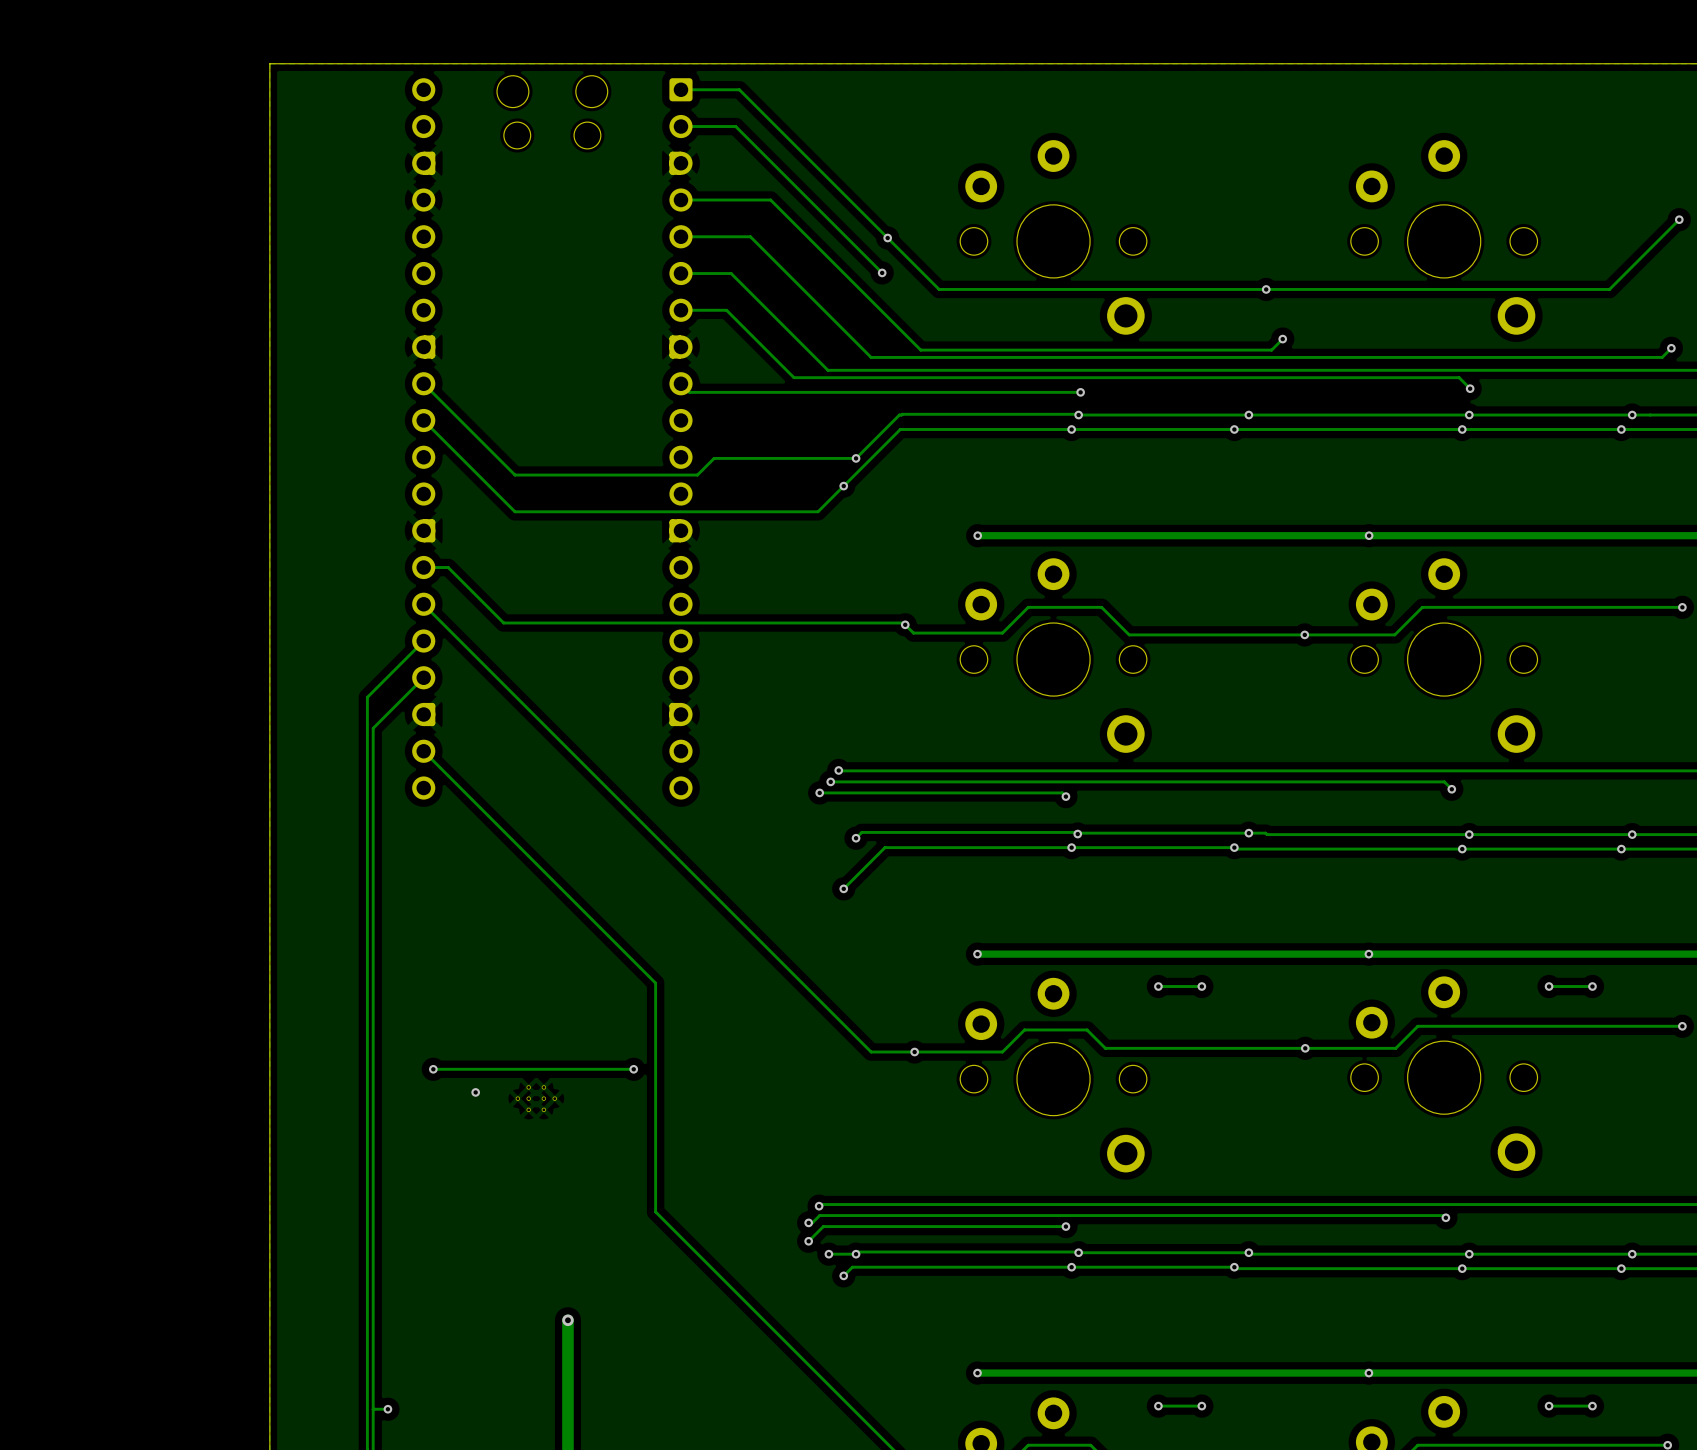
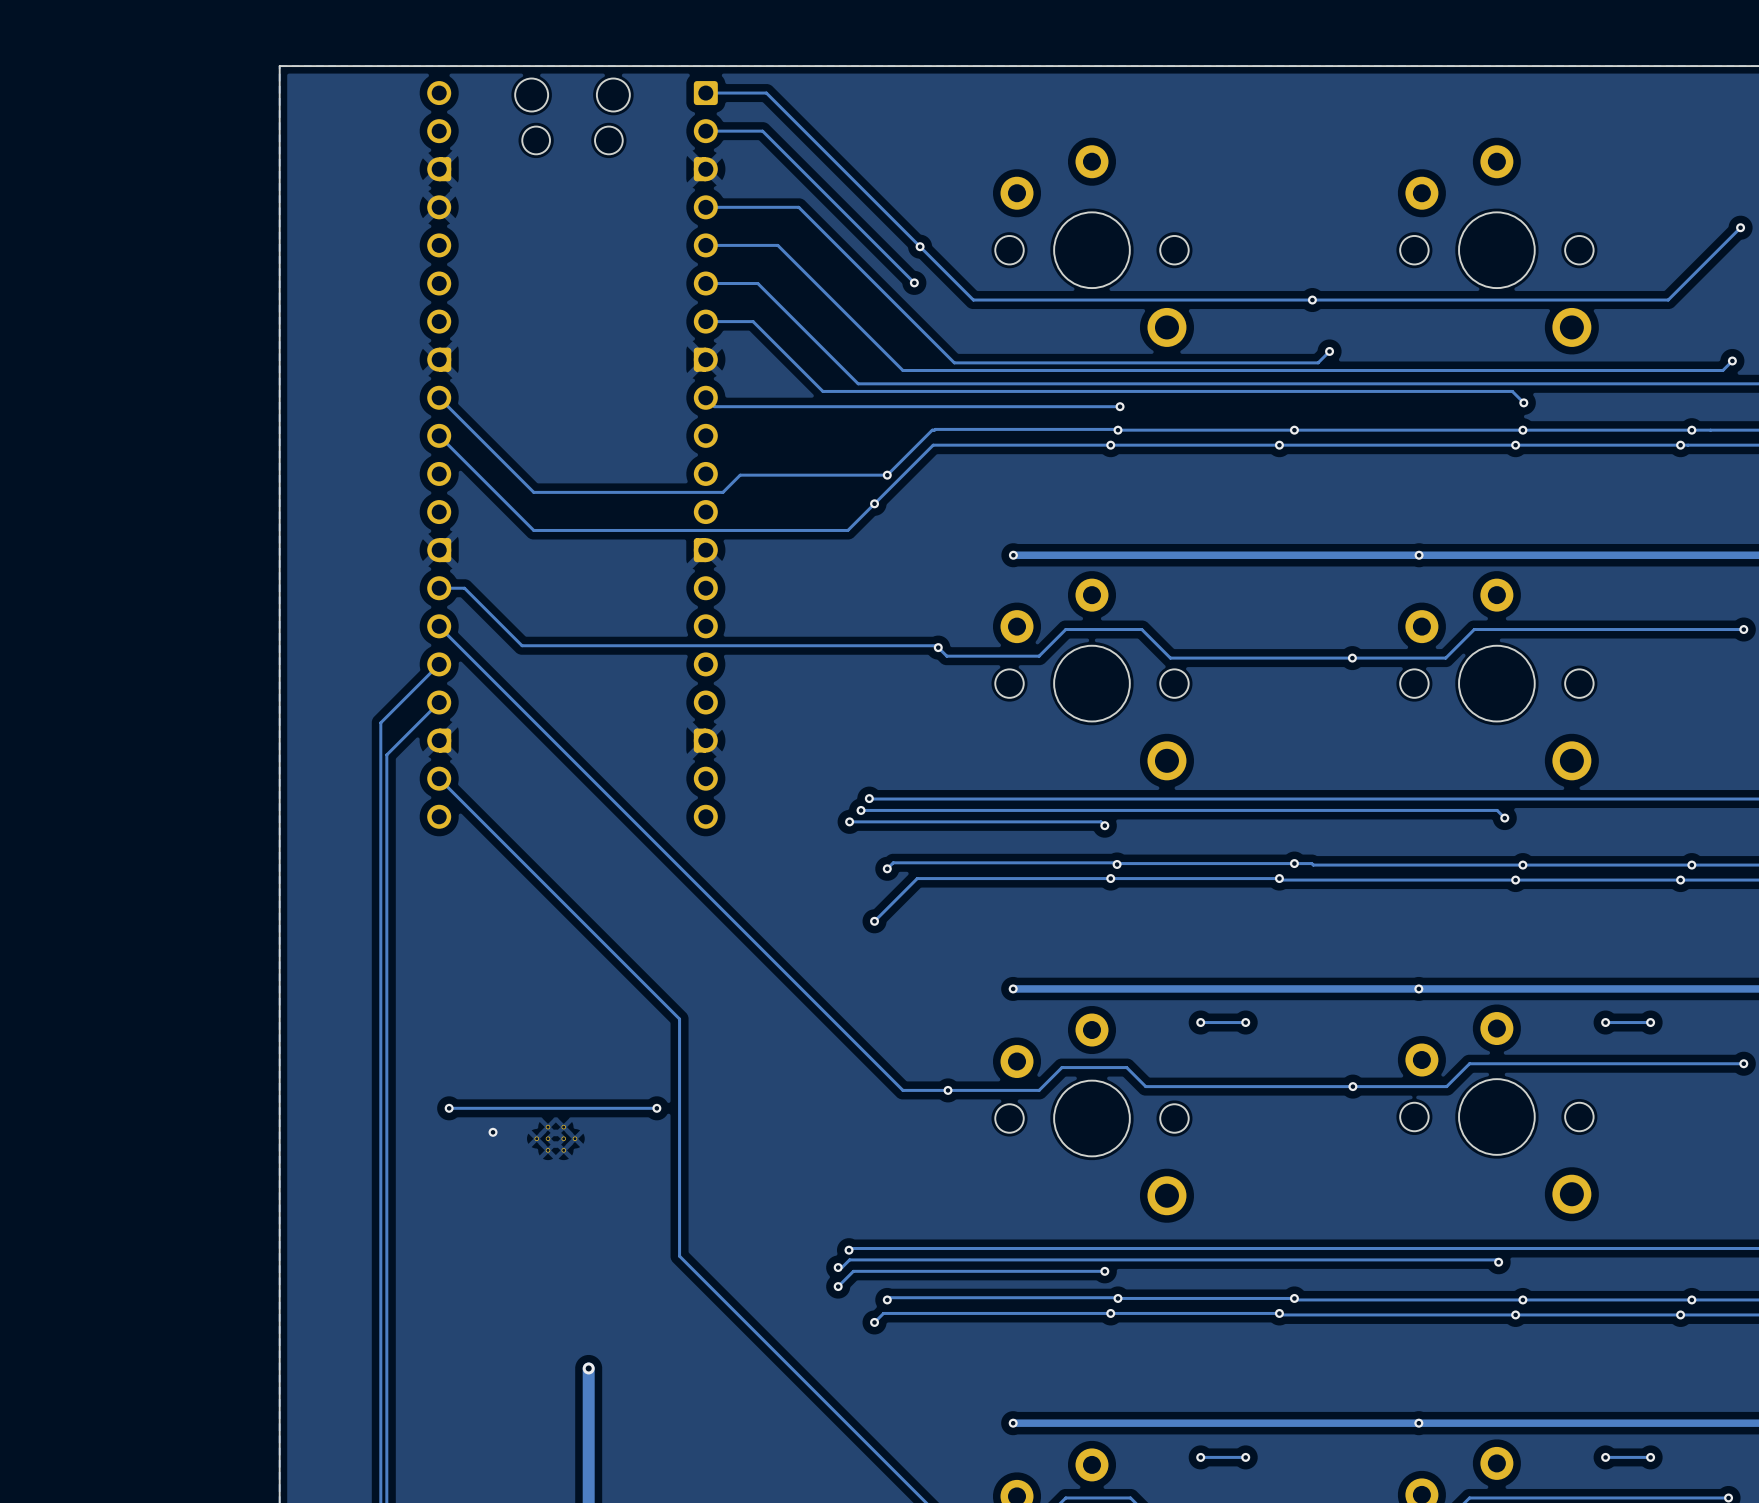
via: (828, 1254) -> none
track: (856, 1254) (828, 1254) -> none
track: (387, 1409) (373, 1409) -> none
via: (387, 1409) -> none

